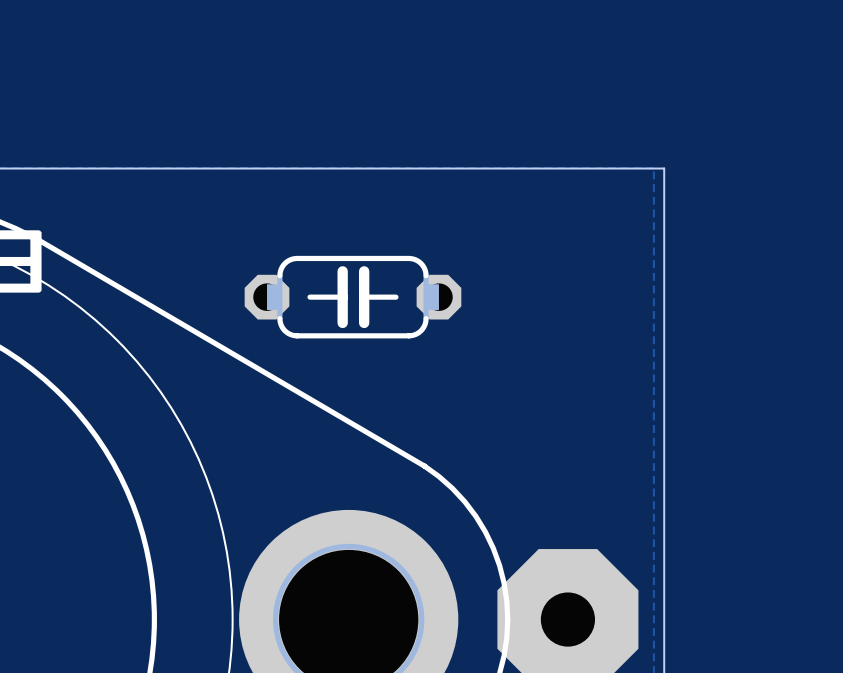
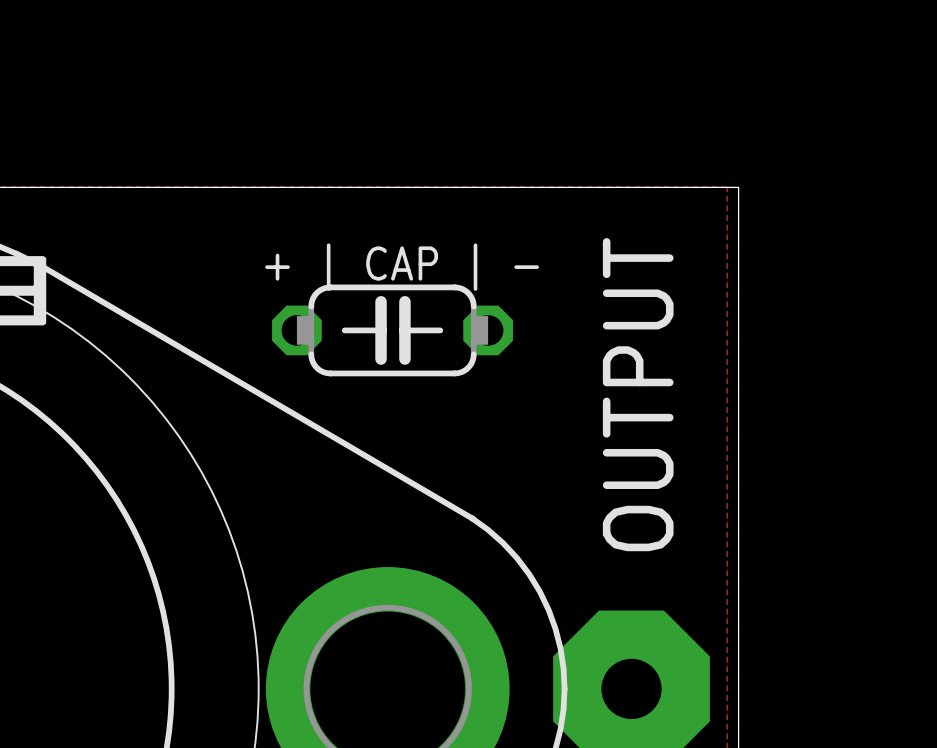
text: none -> + | CAP | - (402, 267)
text: none -> OUTPUT (638, 394)

